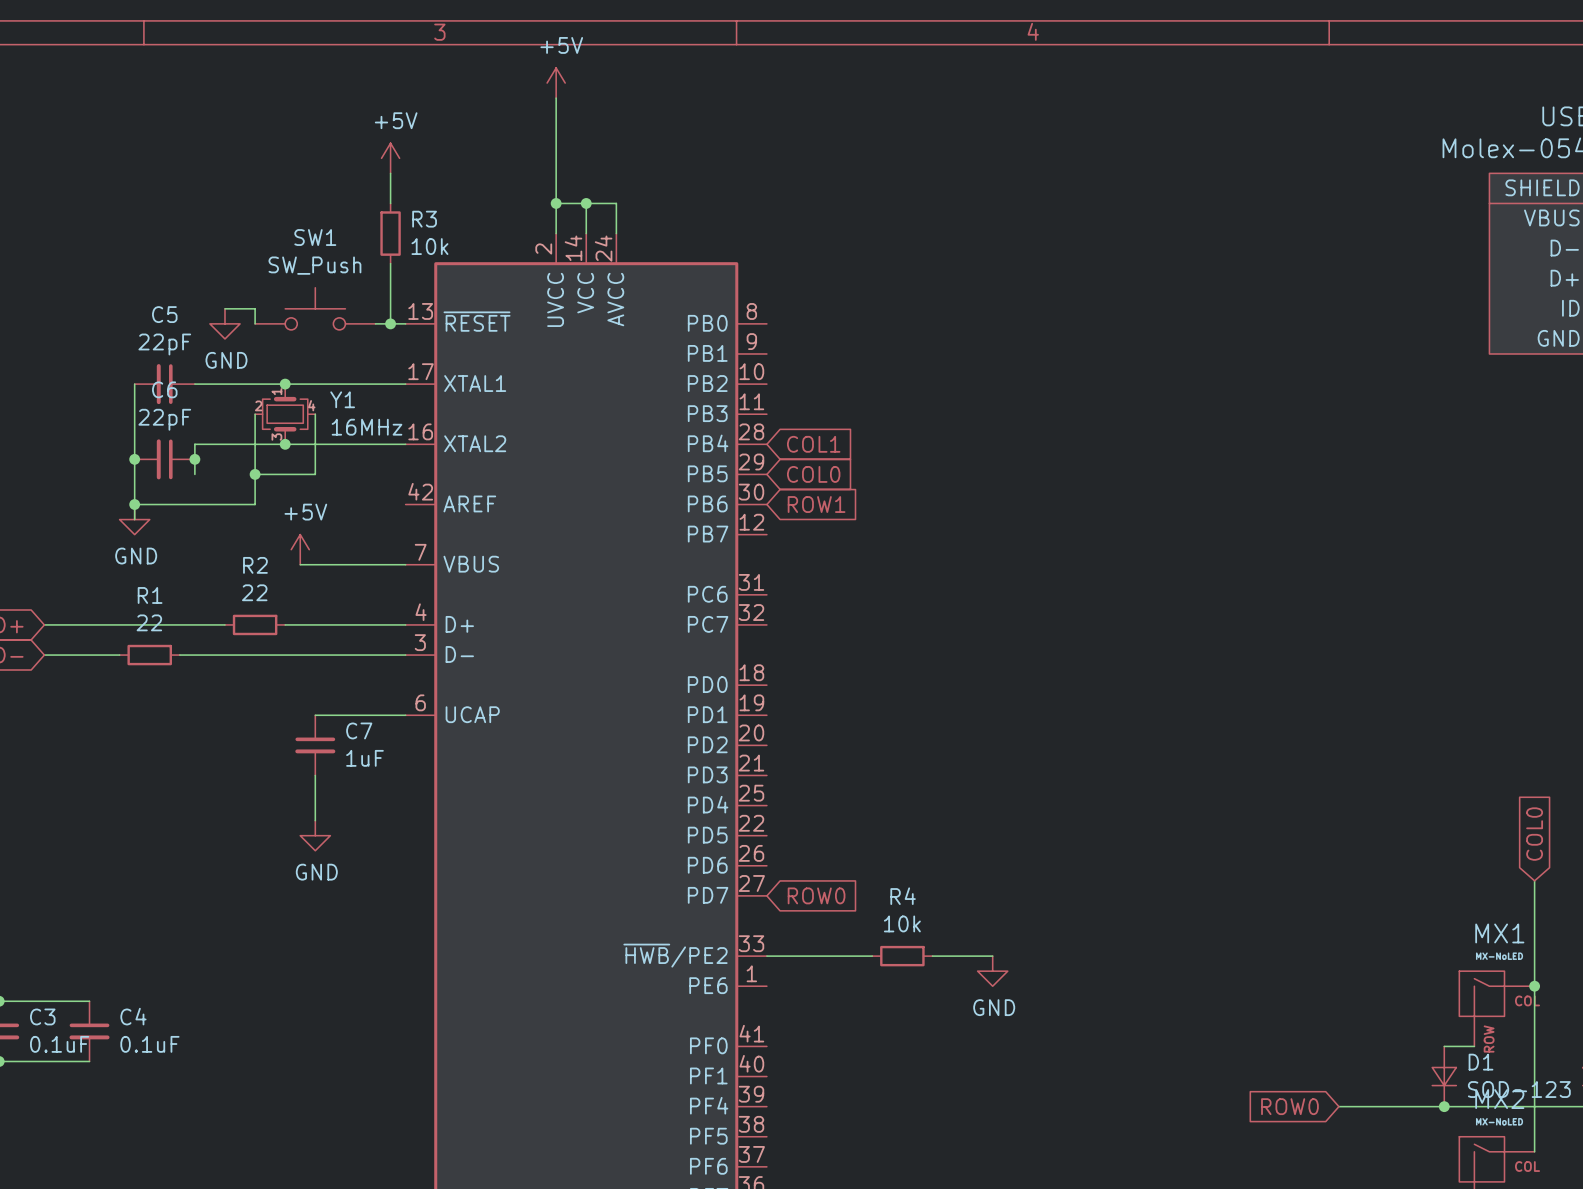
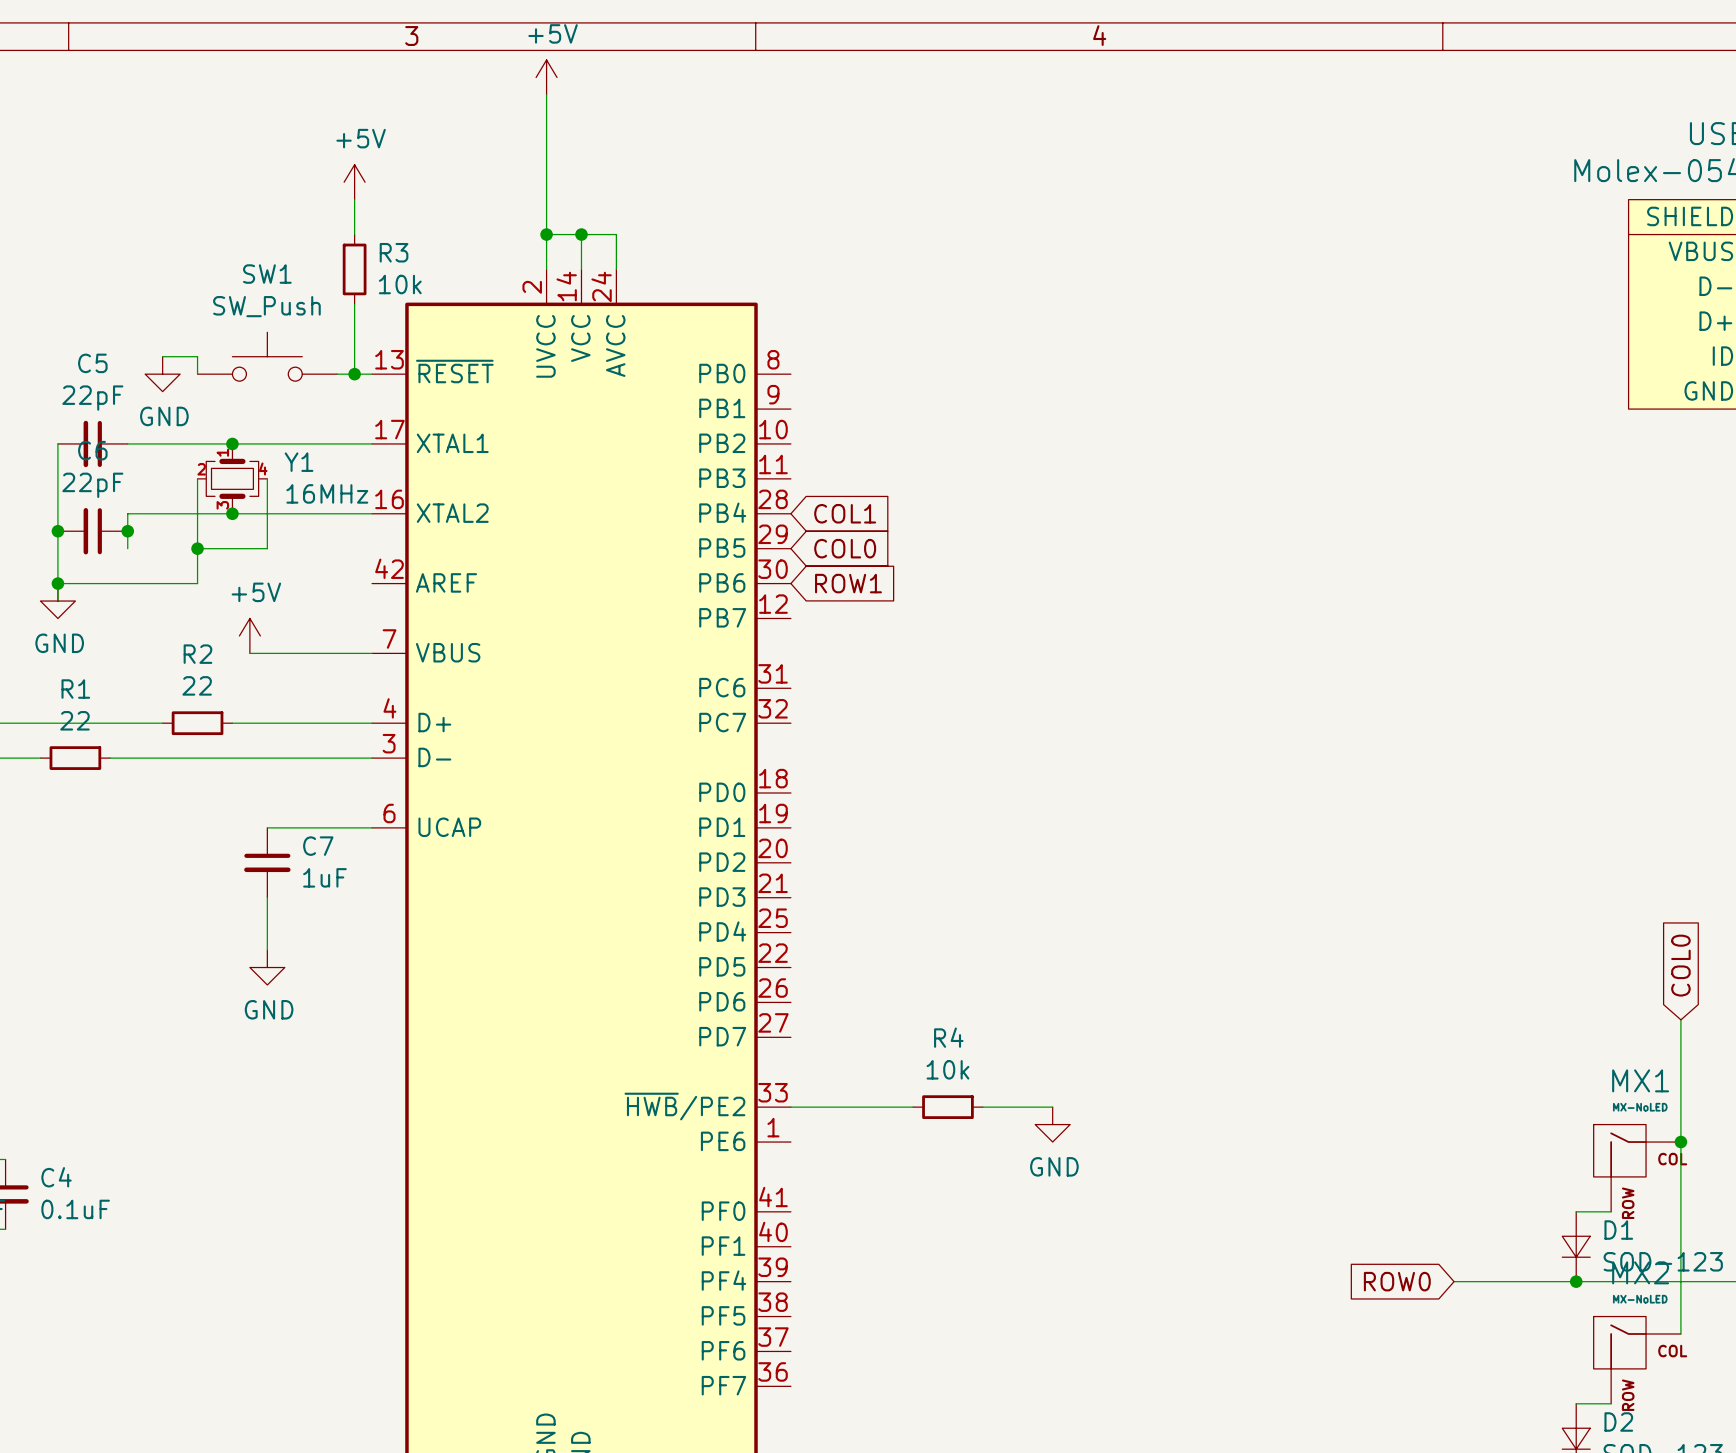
power symbol position: +5V (556, 83) -> +5V (546, 77)
global label: ROW0 (816, 895) -> none

